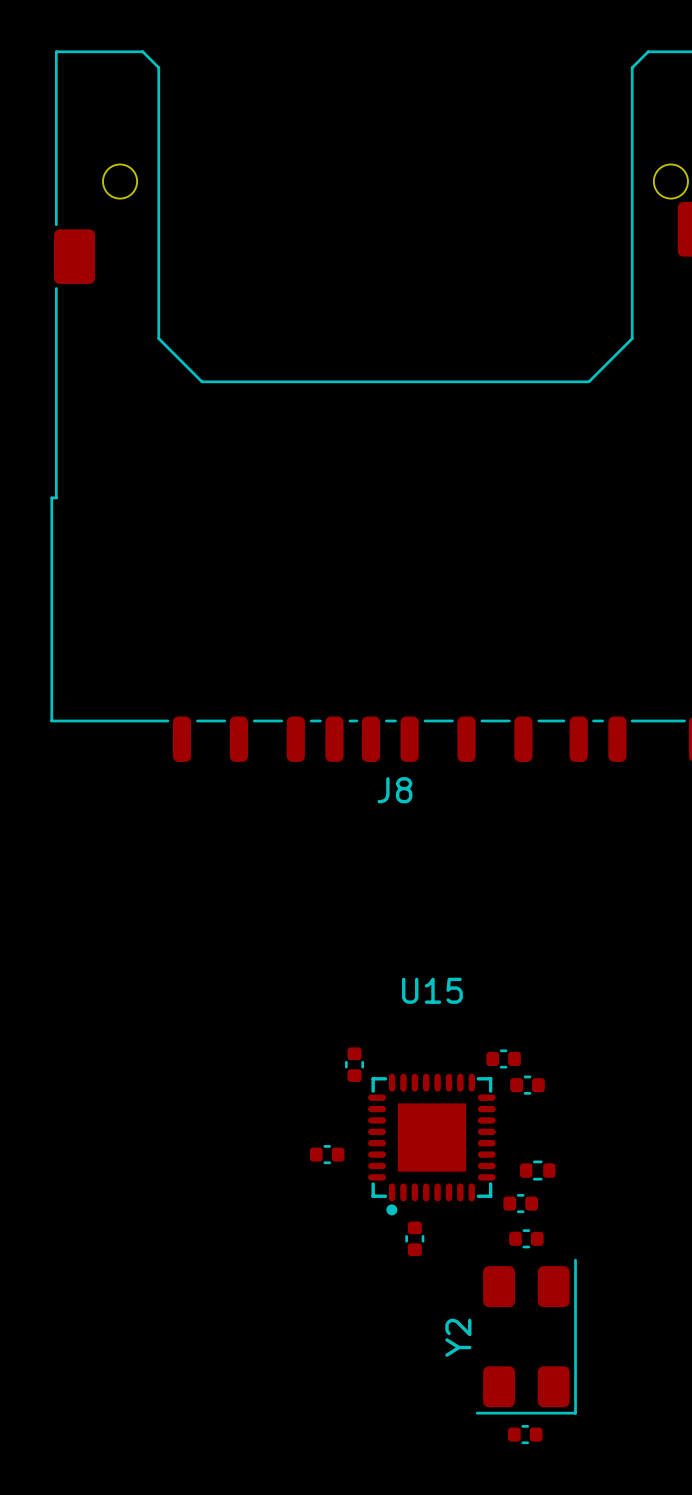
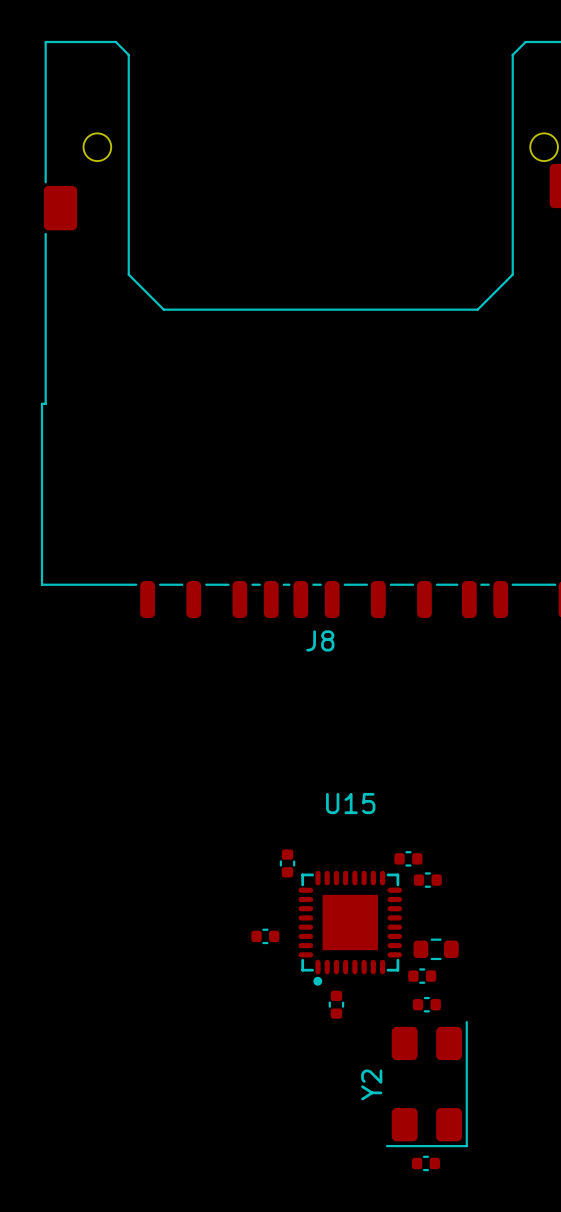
part footprint: [519, 1160, 556, 1181] -> [413, 938, 459, 961]

